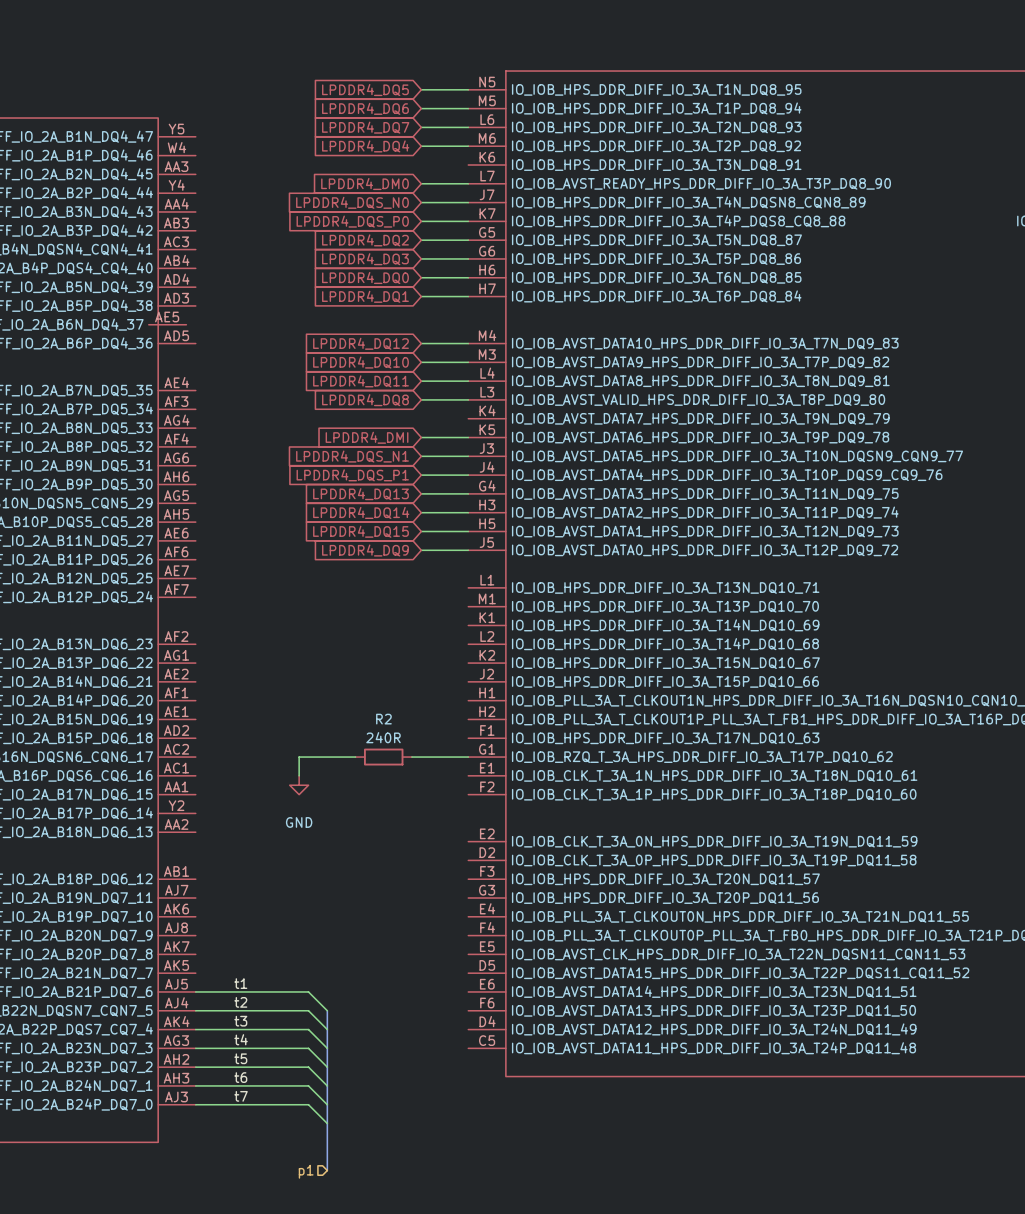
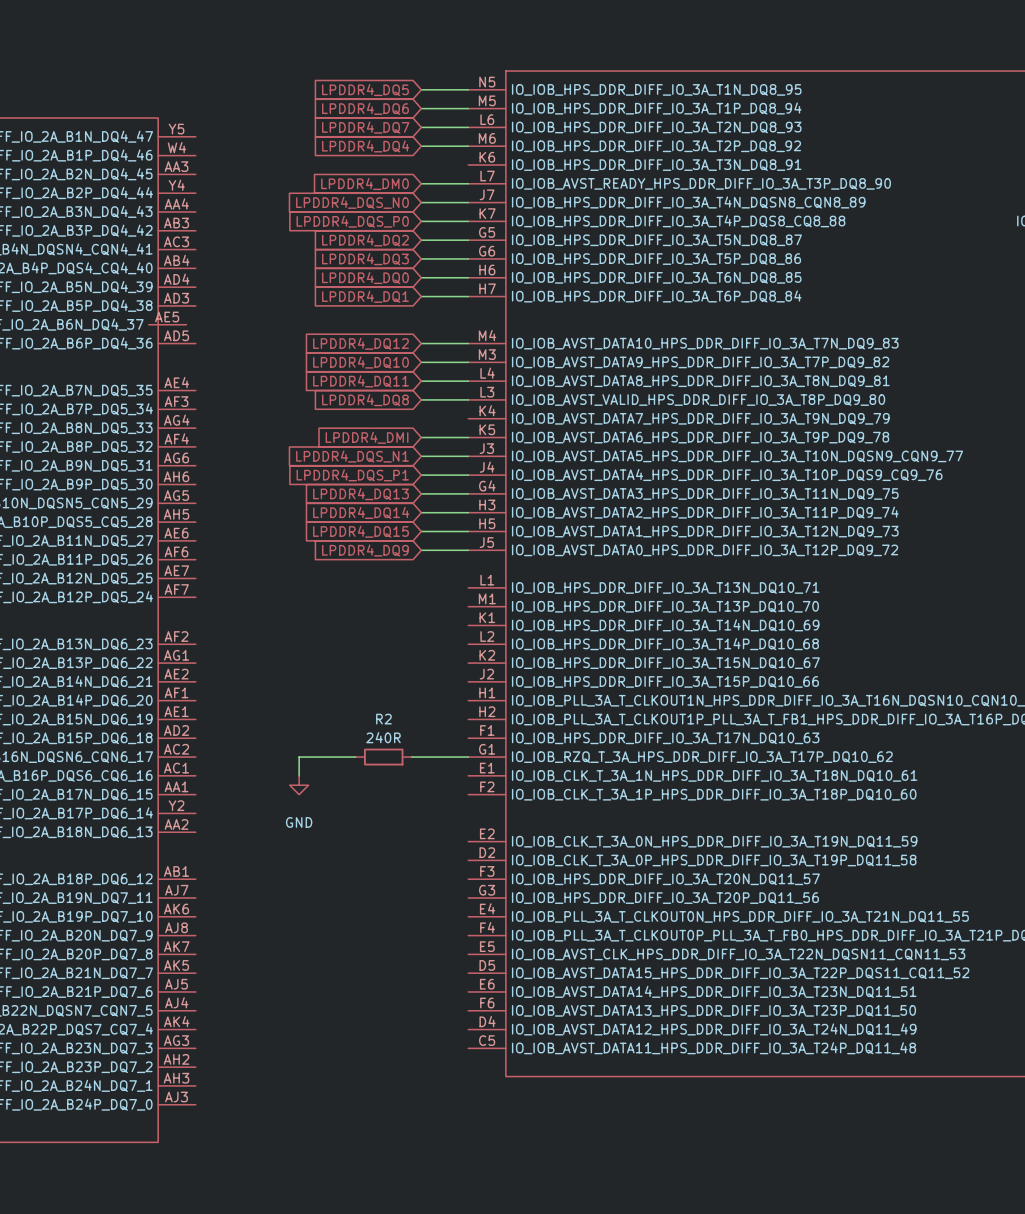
label: t1 (240, 983) -> none
wire: (195, 991) (308, 991) (327, 1010) -> none
label: t2 (240, 1002) -> none
wire: (195, 1010) (308, 1010) (327, 1029) -> none
bus: (327, 1010) (327, 1170) -> none
label: t3 (240, 1021) -> none
wire: (195, 1029) (308, 1029) (327, 1048) -> none
label: t4 (241, 1039) -> none
wire: (195, 1048) (308, 1048) (327, 1067) -> none
label: t5 (240, 1058) -> none
wire: (195, 1067) (308, 1067) (327, 1085) -> none
label: t6 (240, 1077) -> none
wire: (195, 1085) (308, 1085) (327, 1104) -> none
label: t7 (241, 1096) -> none
wire: (195, 1104) (308, 1104) (327, 1123) -> none
hierarchical label: p1 (306, 1171) -> none

